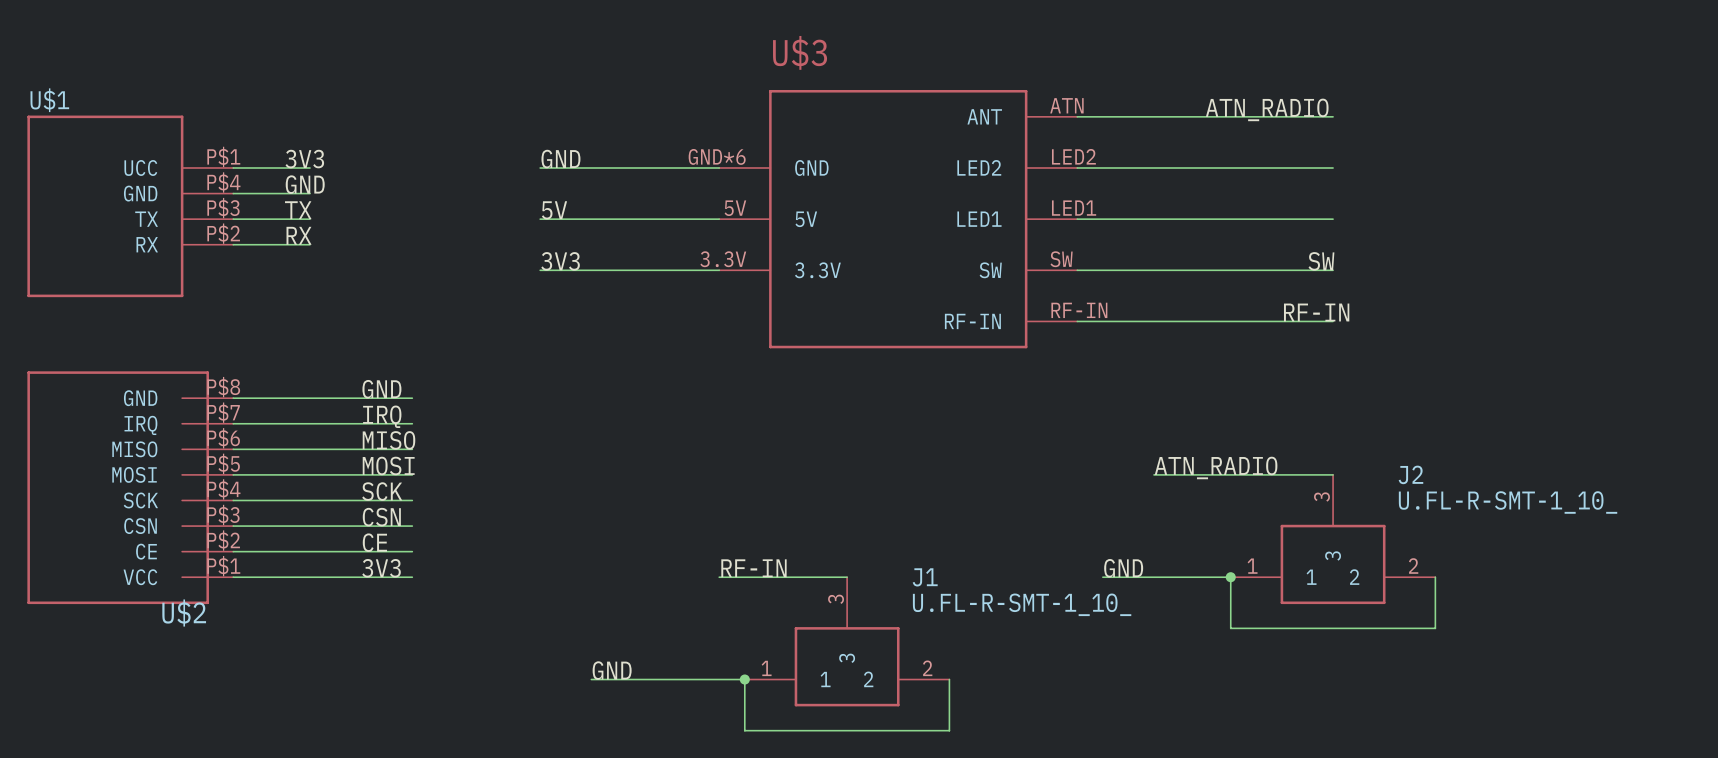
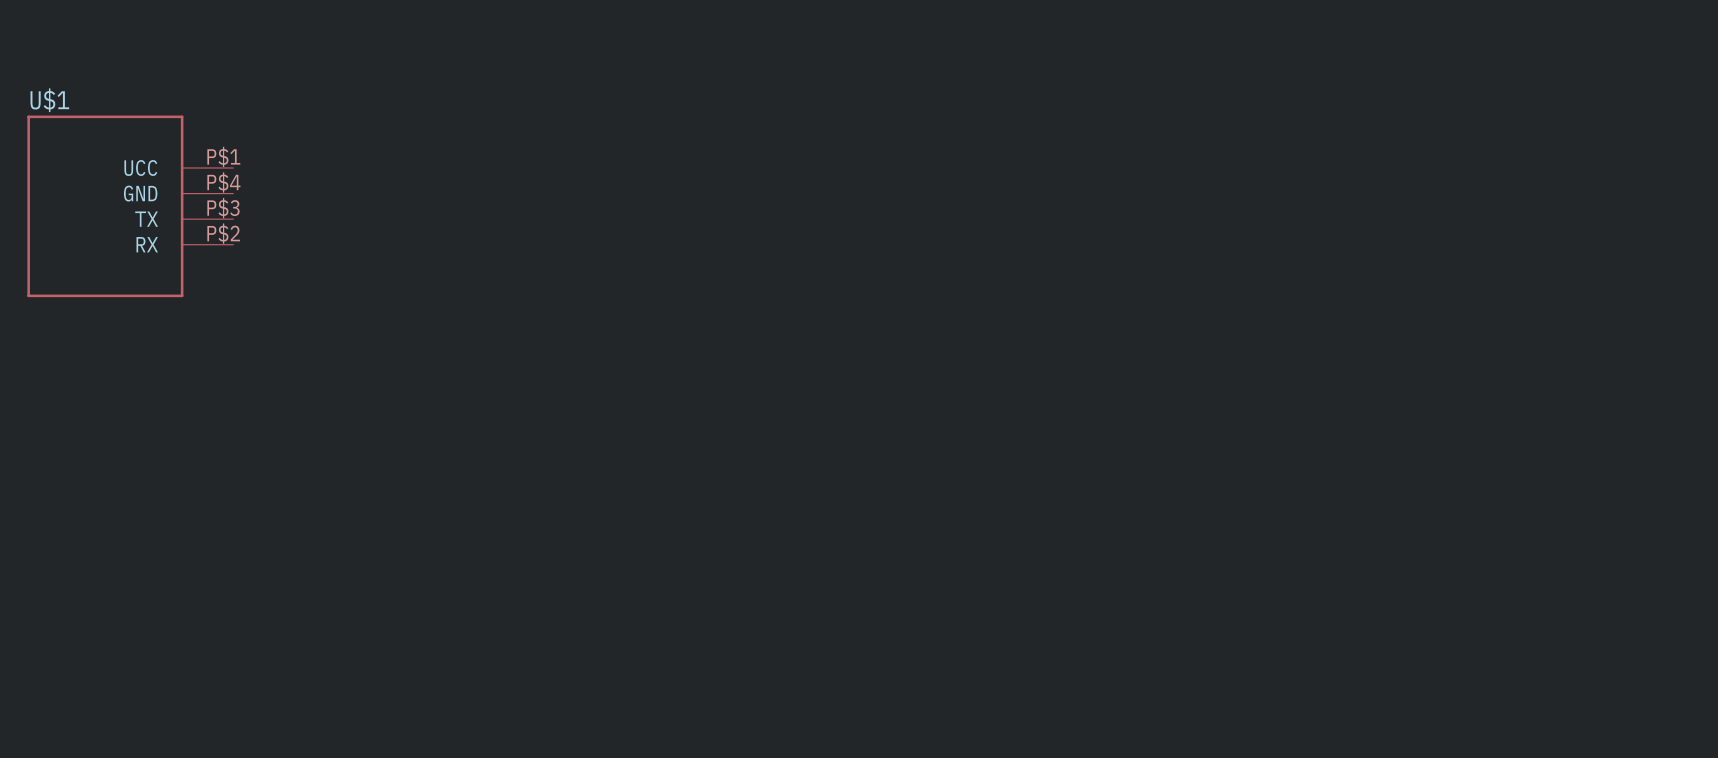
label: ATN_RADIO (1267, 109) -> none
wire: (1077, 116) (1333, 116) -> none
label: 3V3 (304, 159) -> none
label: GND (560, 159) -> none
wire: (233, 167) (310, 167) -> none
wire: (540, 167) (719, 167) -> none
wire: (1077, 167) (1333, 167) -> none
label: GND (305, 184) -> none
wire: (233, 193) (310, 193) -> none
label: TX (298, 210) -> none
label: 5V (554, 210) -> none
wire: (233, 219) (310, 219) -> none
wire: (540, 219) (719, 219) -> none
U$3: (898, 219) -> none
wire: (1077, 219) (1333, 219) -> none
label: RX (299, 235) -> none
wire: (233, 244) (310, 244) -> none
label: 3V3 (560, 261) -> none
label: SW (1321, 261) -> none
wire: (540, 270) (719, 270) -> none
wire: (1077, 270) (1333, 270) -> none
label: RF-IN (1316, 312) -> none
wire: (1077, 321) (1333, 321) -> none
label: GND (381, 389) -> none
wire: (233, 398) (412, 398) -> none
label: IRQ (382, 416) -> none
wire: (233, 423) (412, 423) -> none
label: MISO (389, 440) -> none
wire: (233, 449) (412, 449) -> none
label: MOSI (388, 465) -> none
label: ATN_RADIO (1216, 467) -> none
wire: (233, 474) (412, 474) -> none
wire: (1154, 474) (1333, 474) -> none
U$2: (130, 487) -> none
label: SCK (382, 491) -> none
wire: (233, 500) (412, 500) -> none
label: CSN (381, 517) -> none
wire: (233, 526) (412, 526) -> none
J2: U.FL-R-SMT-1_10_ (1333, 539) -> none
label: CE (374, 542) -> none
wire: (233, 551) (412, 551) -> none
label: 3V3 (381, 568) -> none
label: RF-IN (753, 568) -> none
label: GND (1123, 568) -> none
wire: (233, 577) (412, 577) -> none
wire: (719, 577) (847, 577) -> none
wire: (1102, 577) (1230, 577) (1230, 628) (1435, 628) (1435, 577) -> none
junction: (1230, 577) -> none
J1: U.FL-R-SMT-1_10_ (847, 641) -> none
label: GND (612, 670) -> none
wire: (591, 679) (744, 679) (744, 730) (949, 730) (949, 679) -> none
junction: (744, 679) -> none

